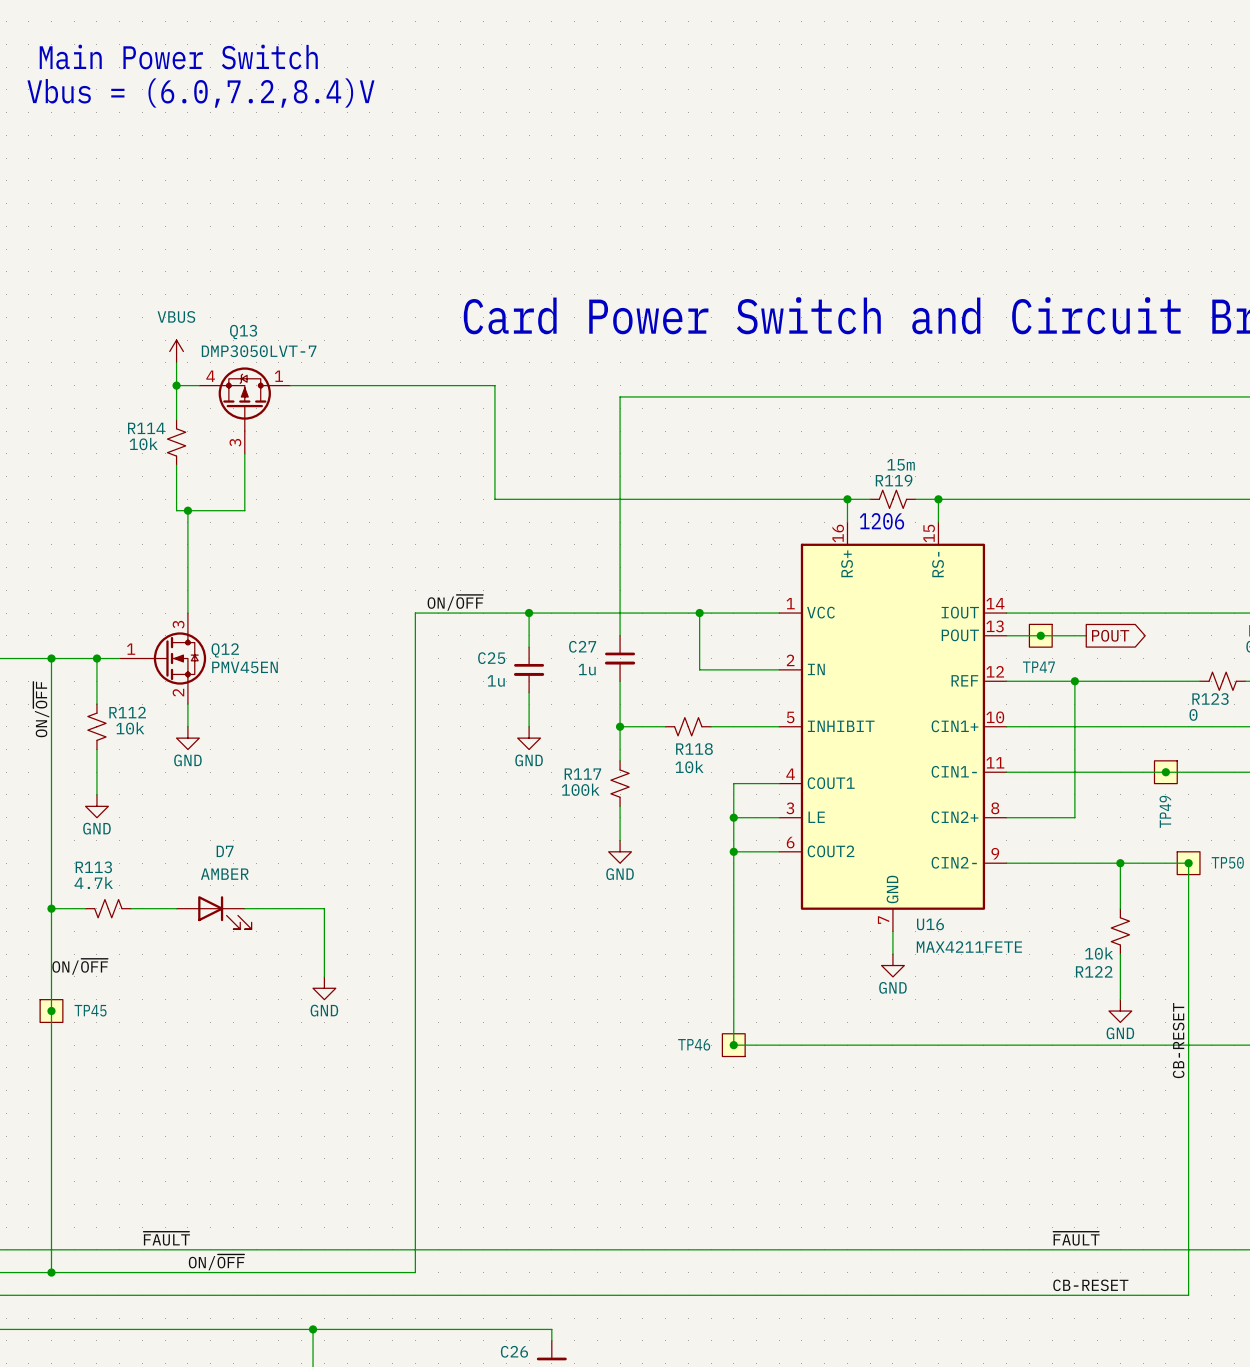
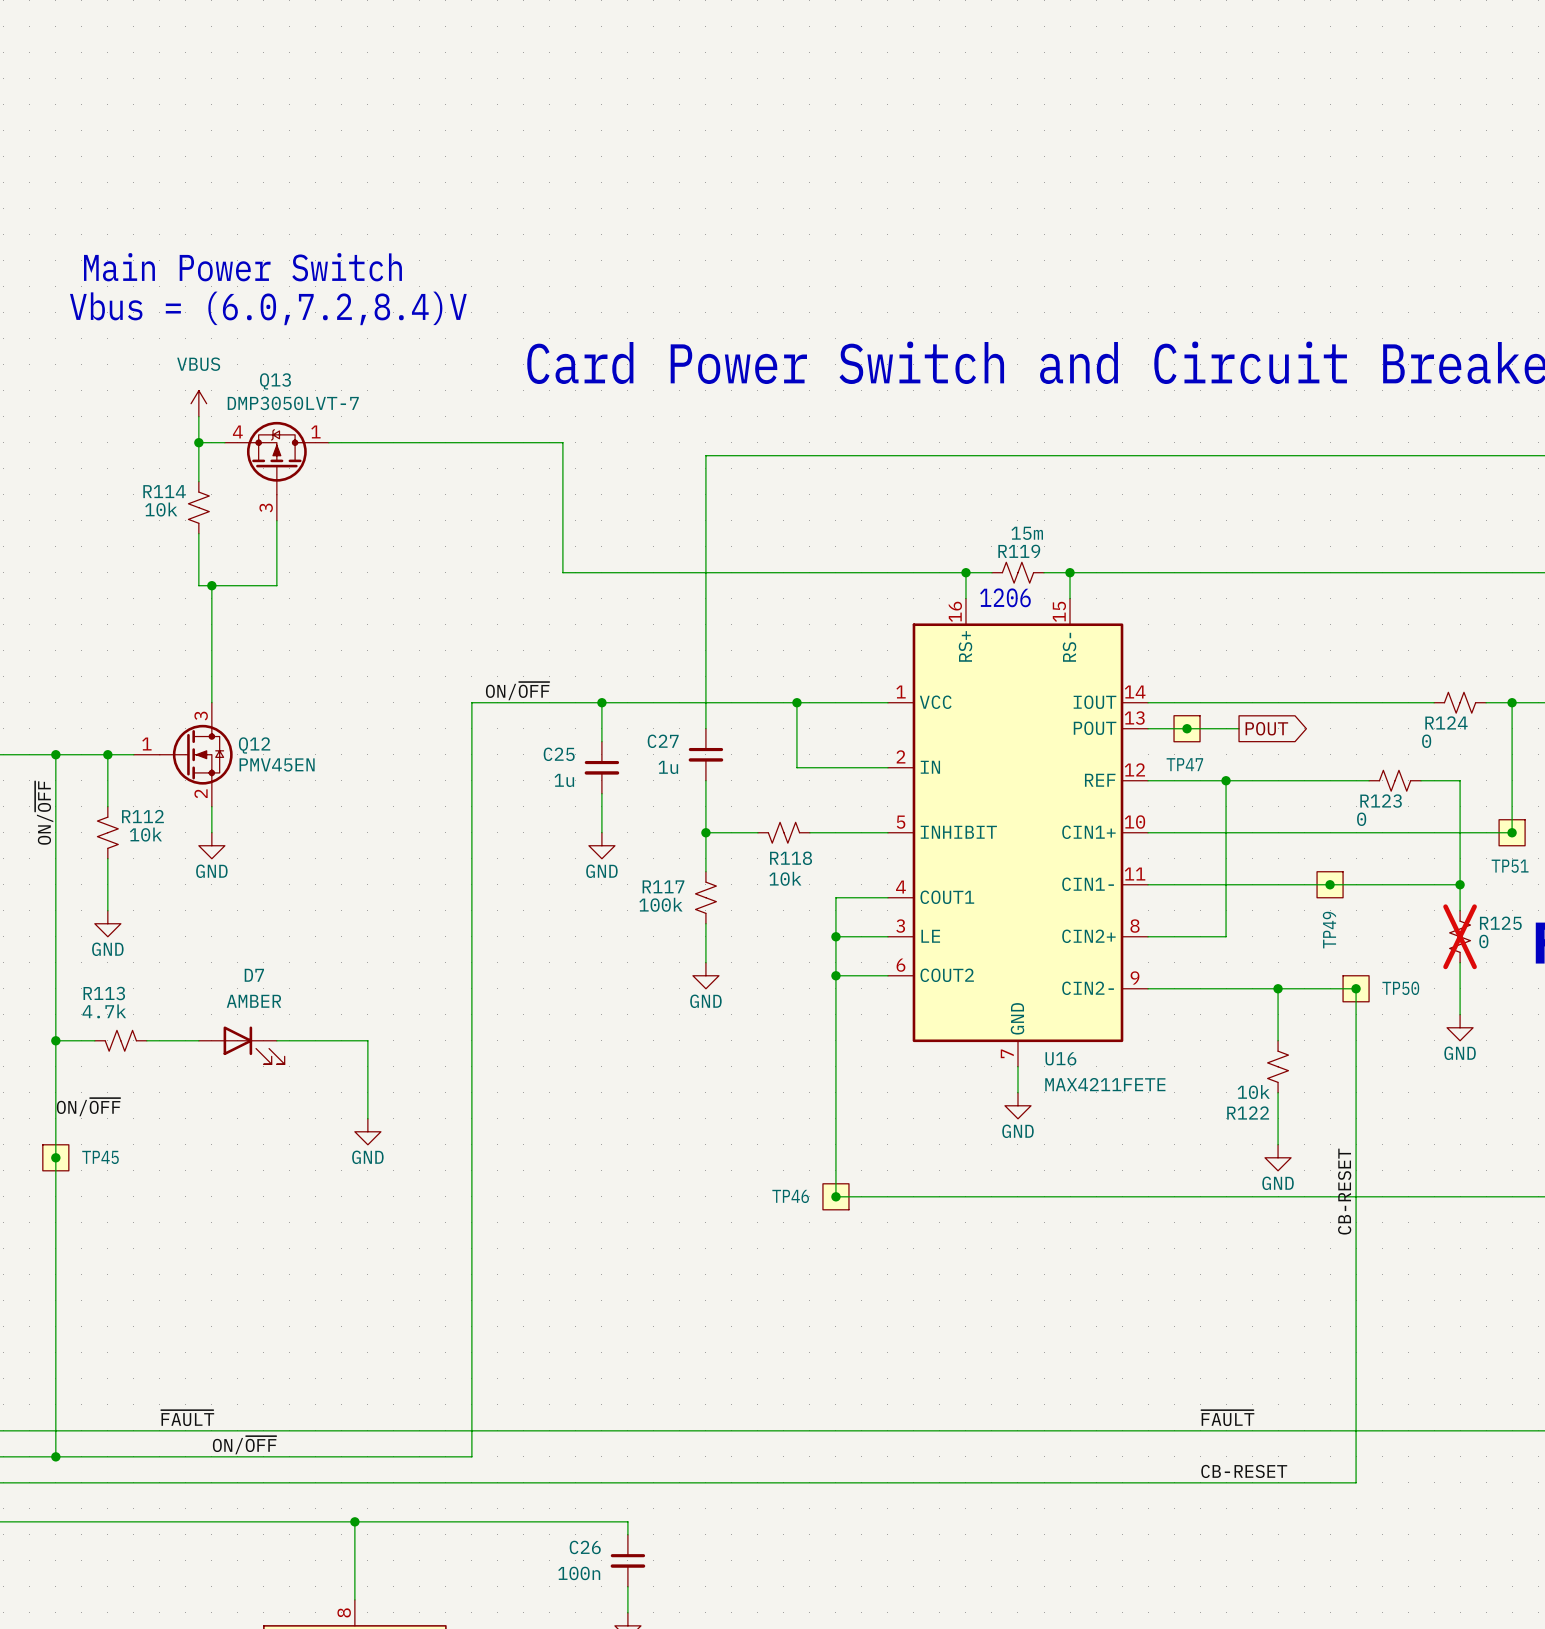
text position: Main Power Switch (178, 57) -> Main Power Switch (242, 267)
text position: Vbus = (6.0,7.2,8.4)V (200, 93) -> Vbus = (6.0,7.2,8.4)V (268, 308)

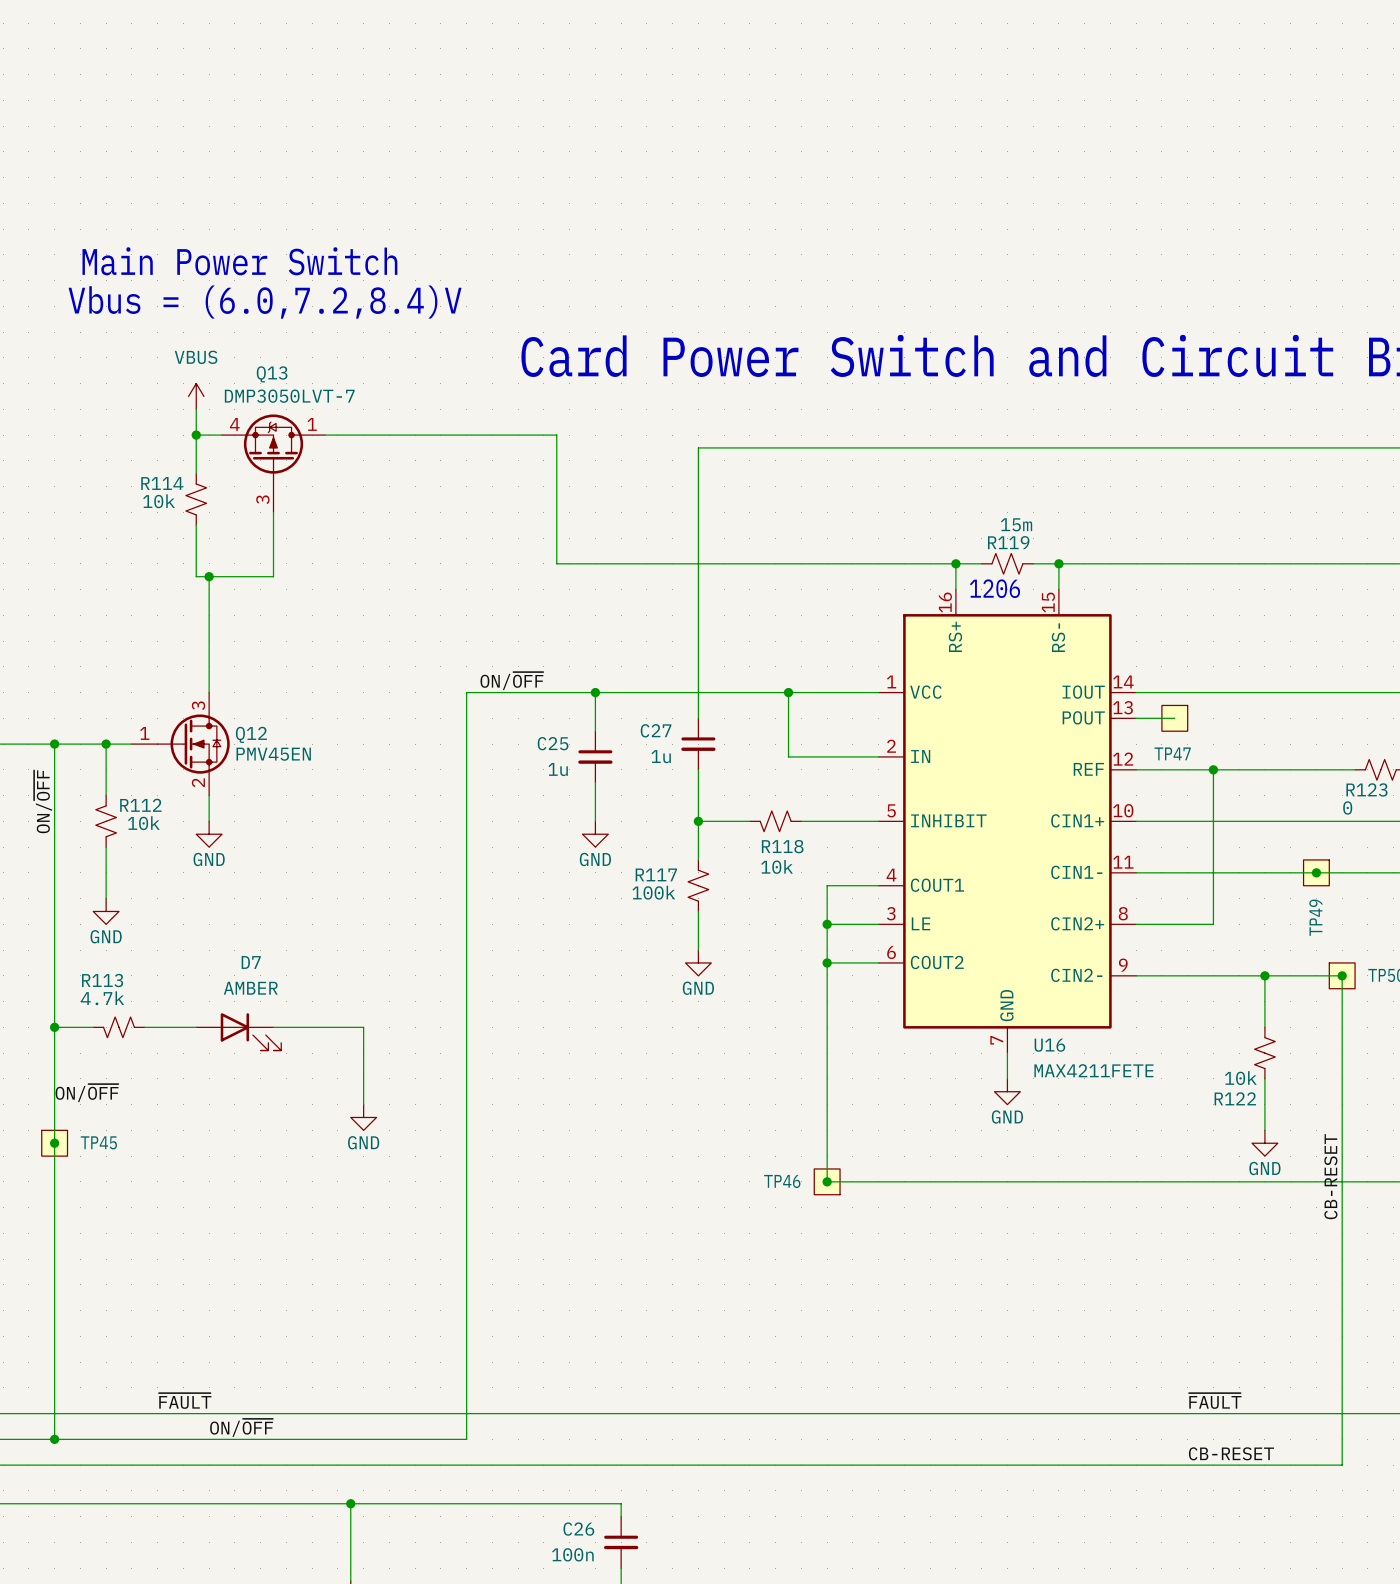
wire: (1187, 728) (1239, 728) -> none
junction: (1187, 728) -> none
global label: POUT (1266, 728) -> none

